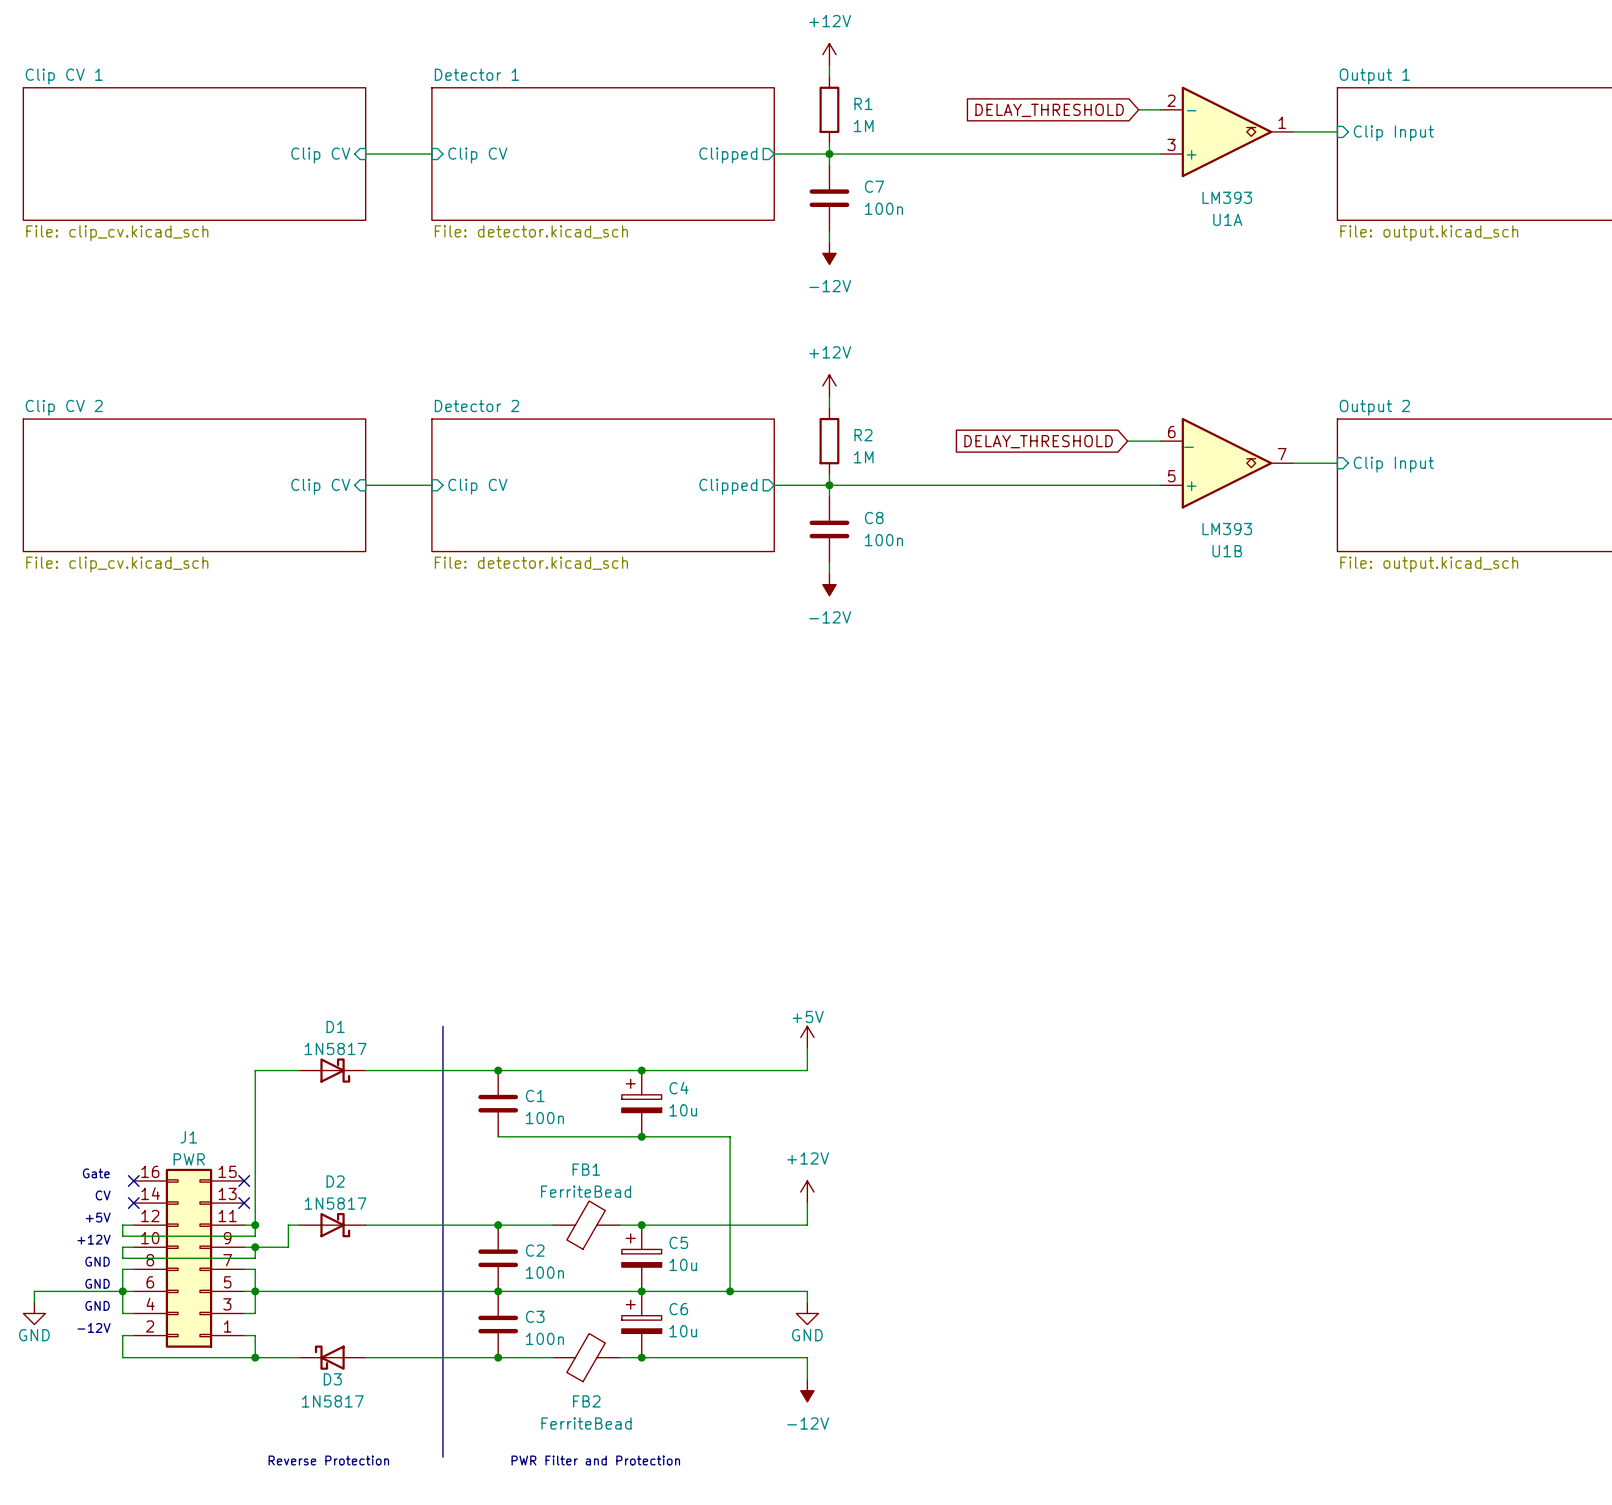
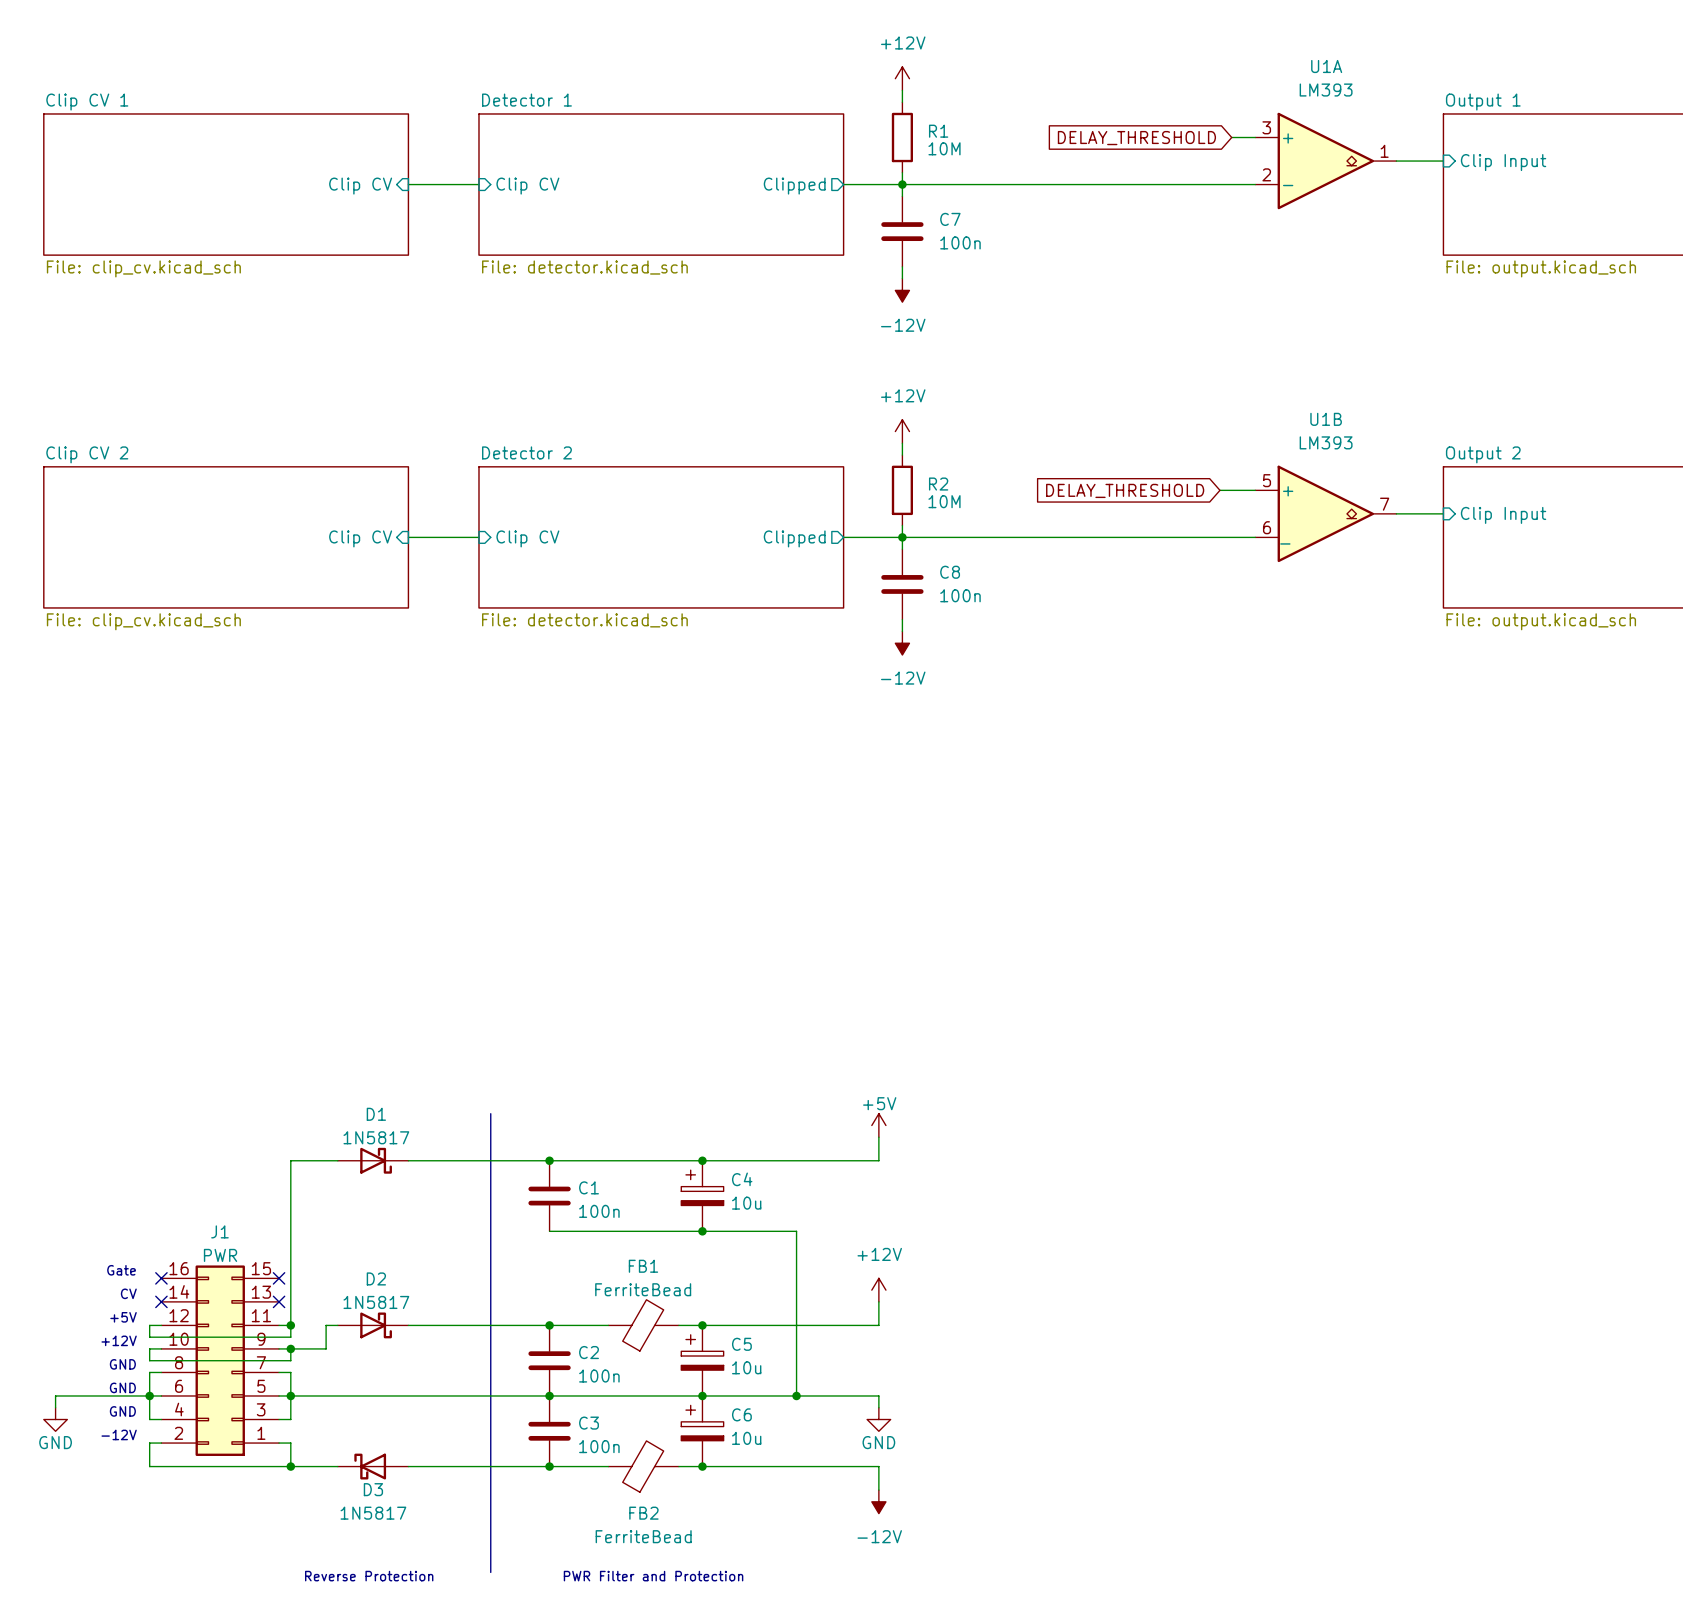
R1 value: 1M (863, 126) -> 10M (944, 148)
U1A flip: as is (1226, 131) -> up-down (1325, 161)
R2 value: 1M (863, 457) -> 10M (944, 501)
U1B flip: as is (1226, 463) -> up-down (1325, 513)

